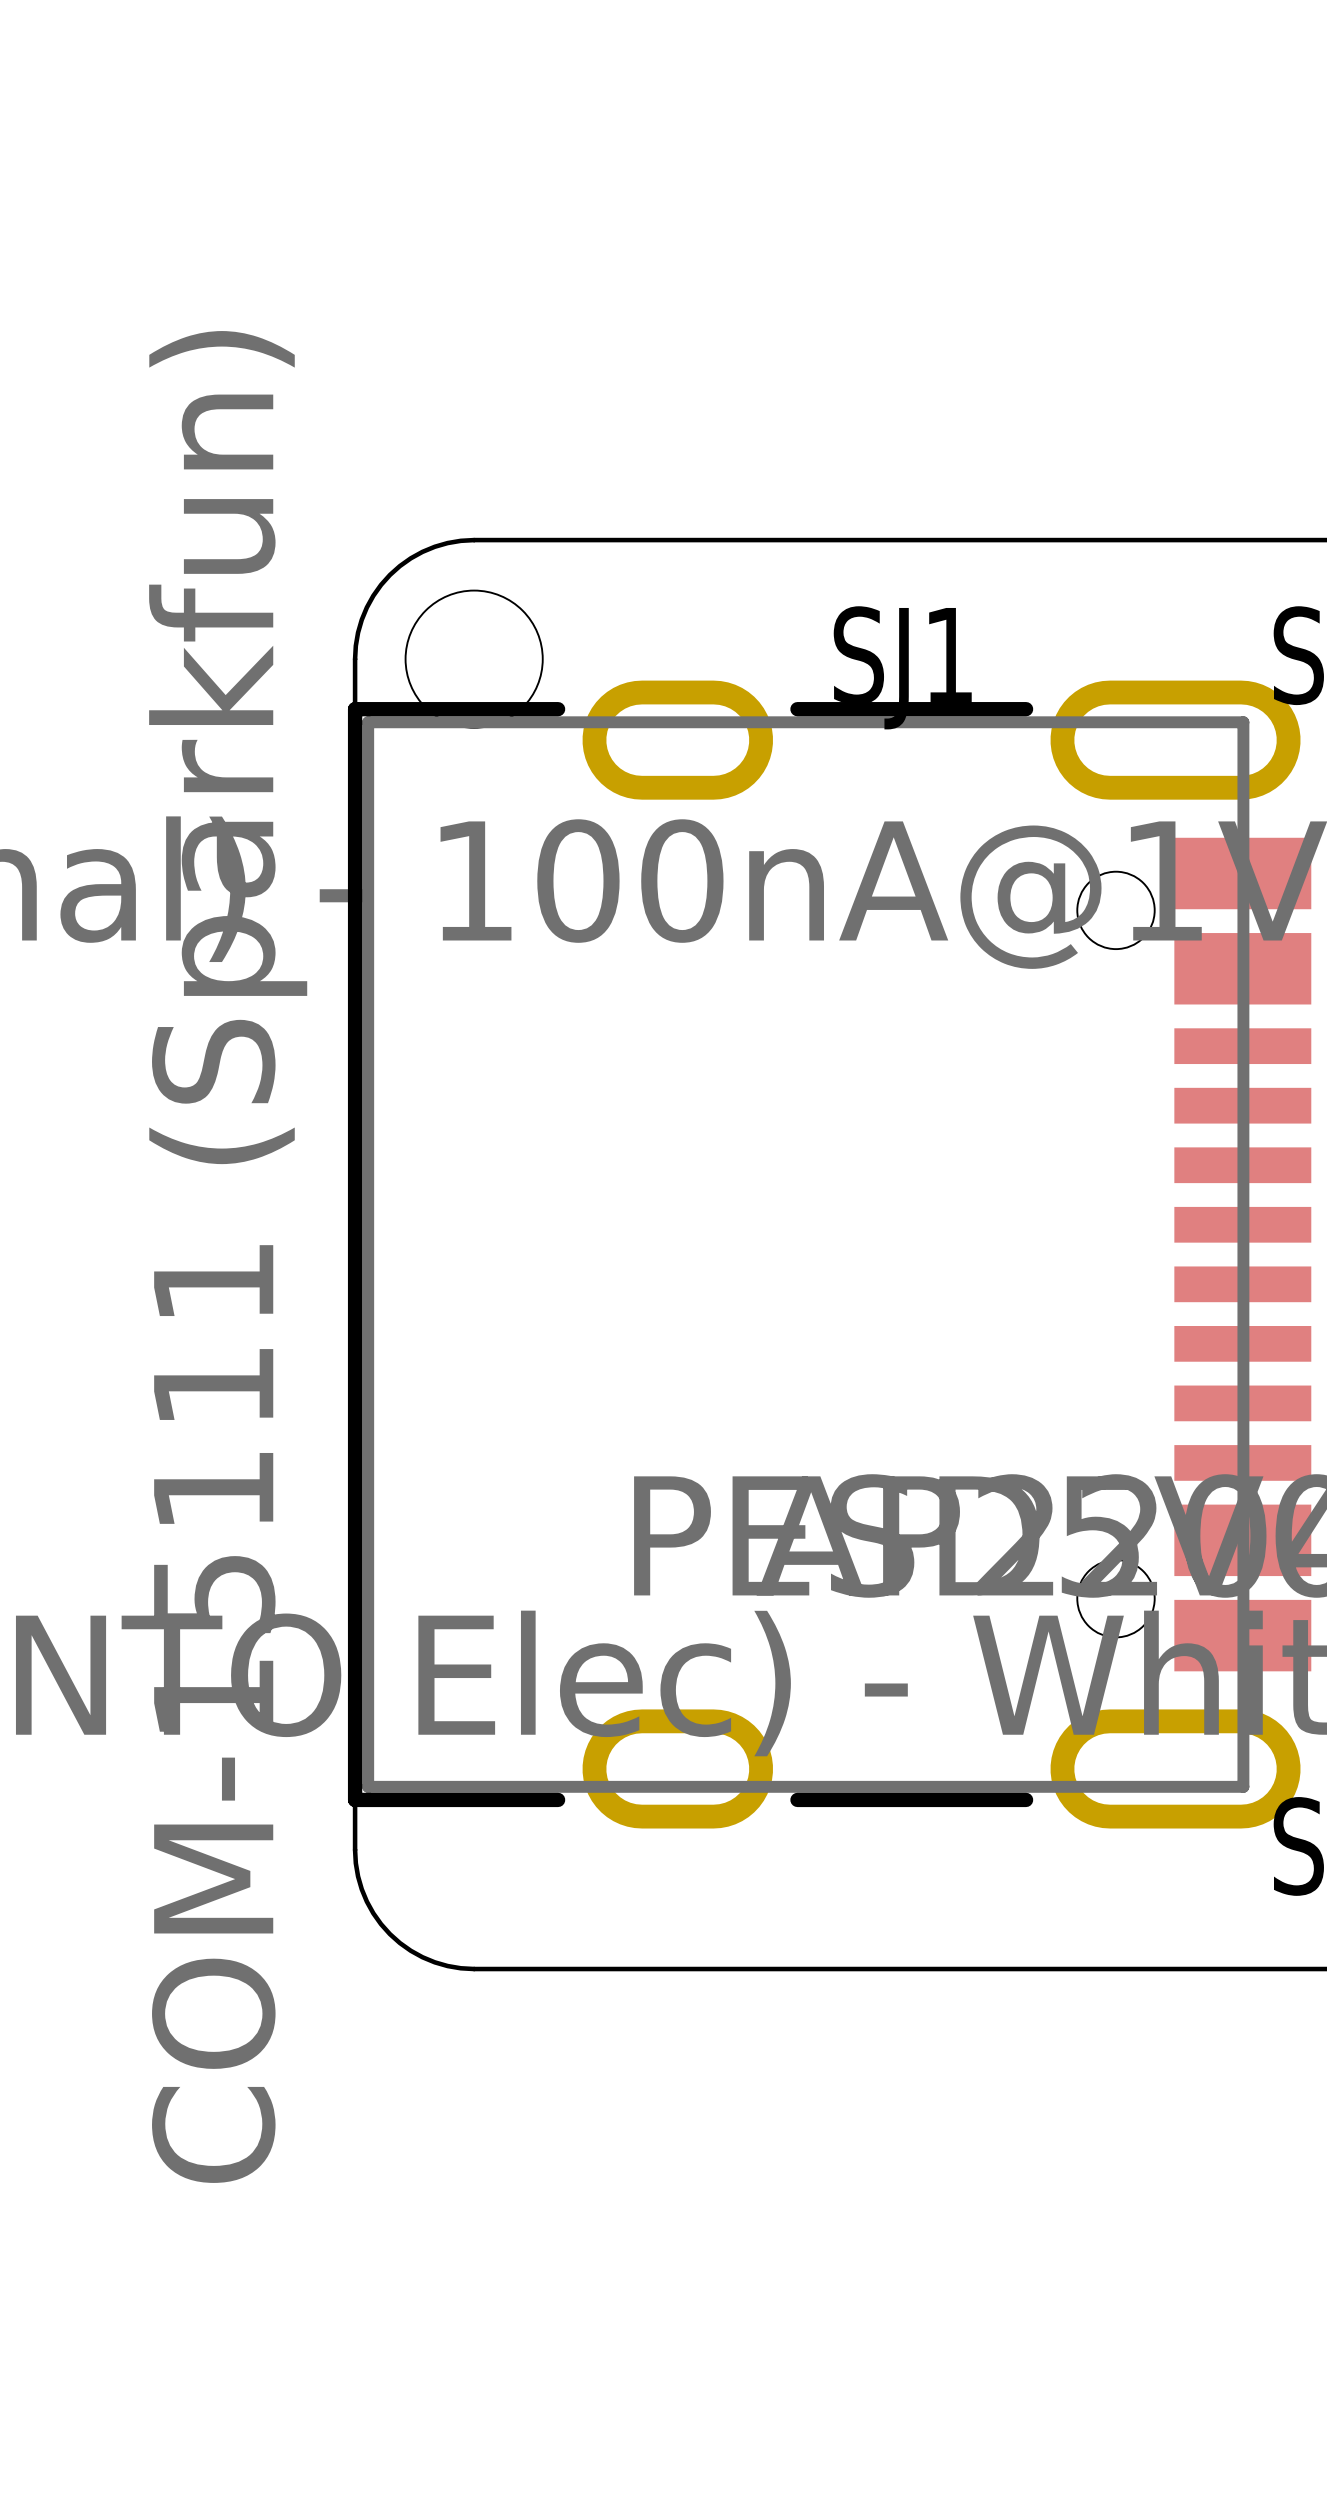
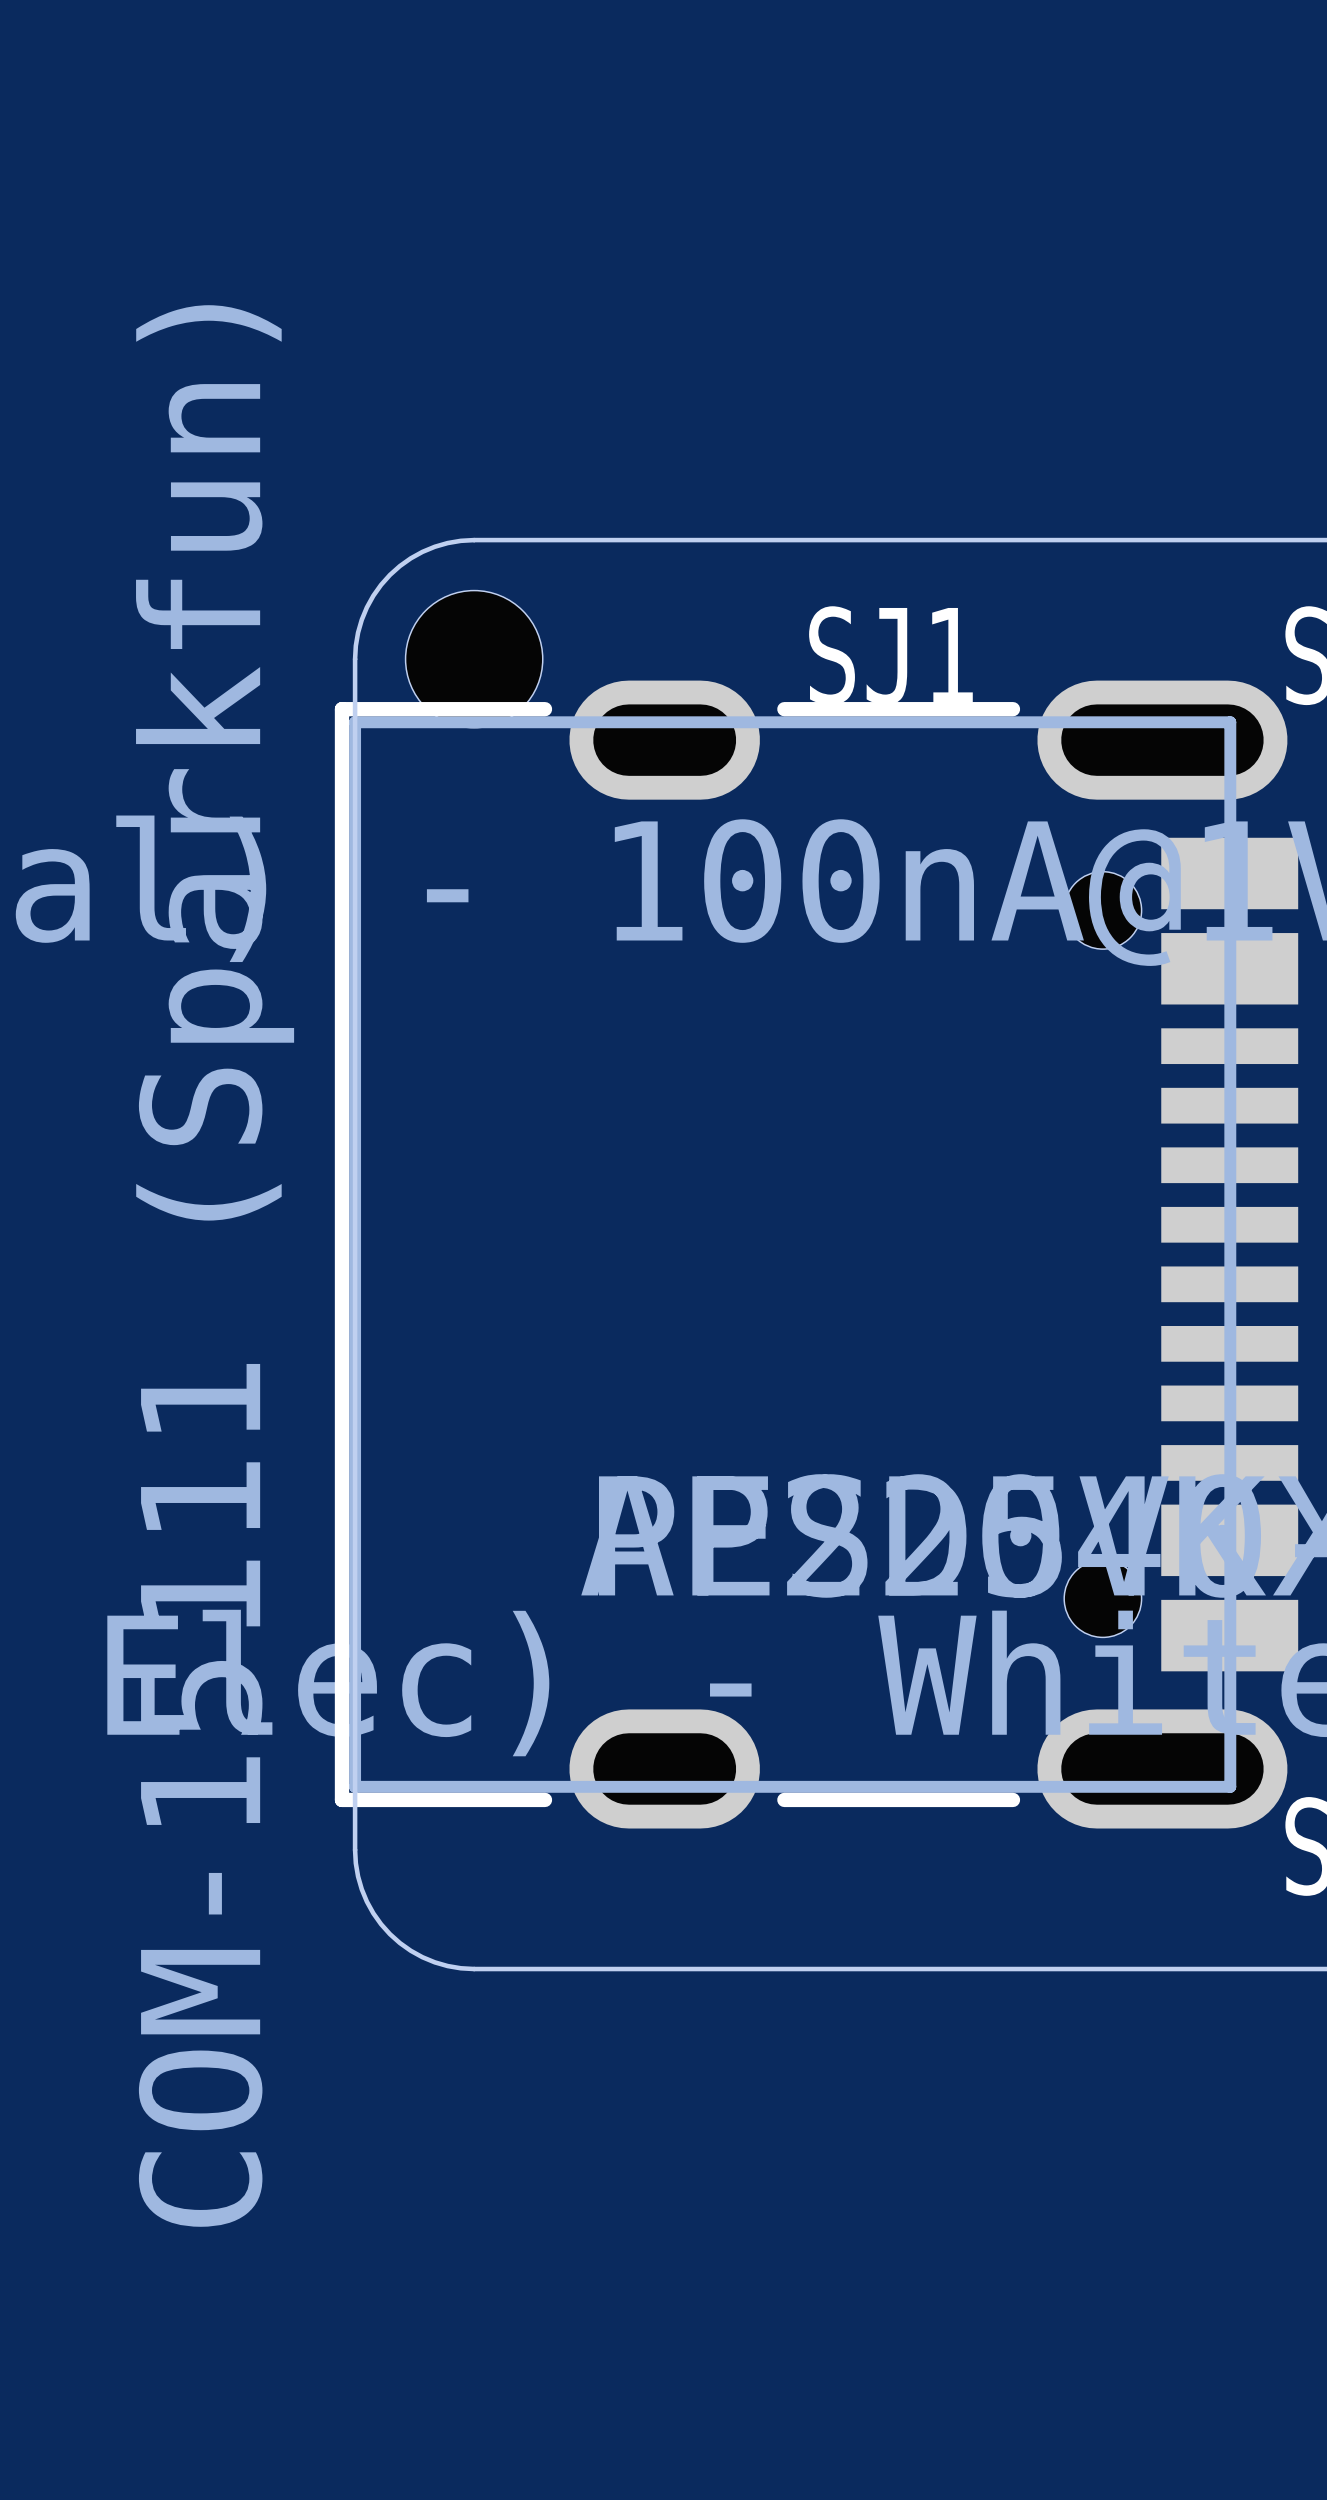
SJ1 position: (829, 1254) -> (816, 1254)

